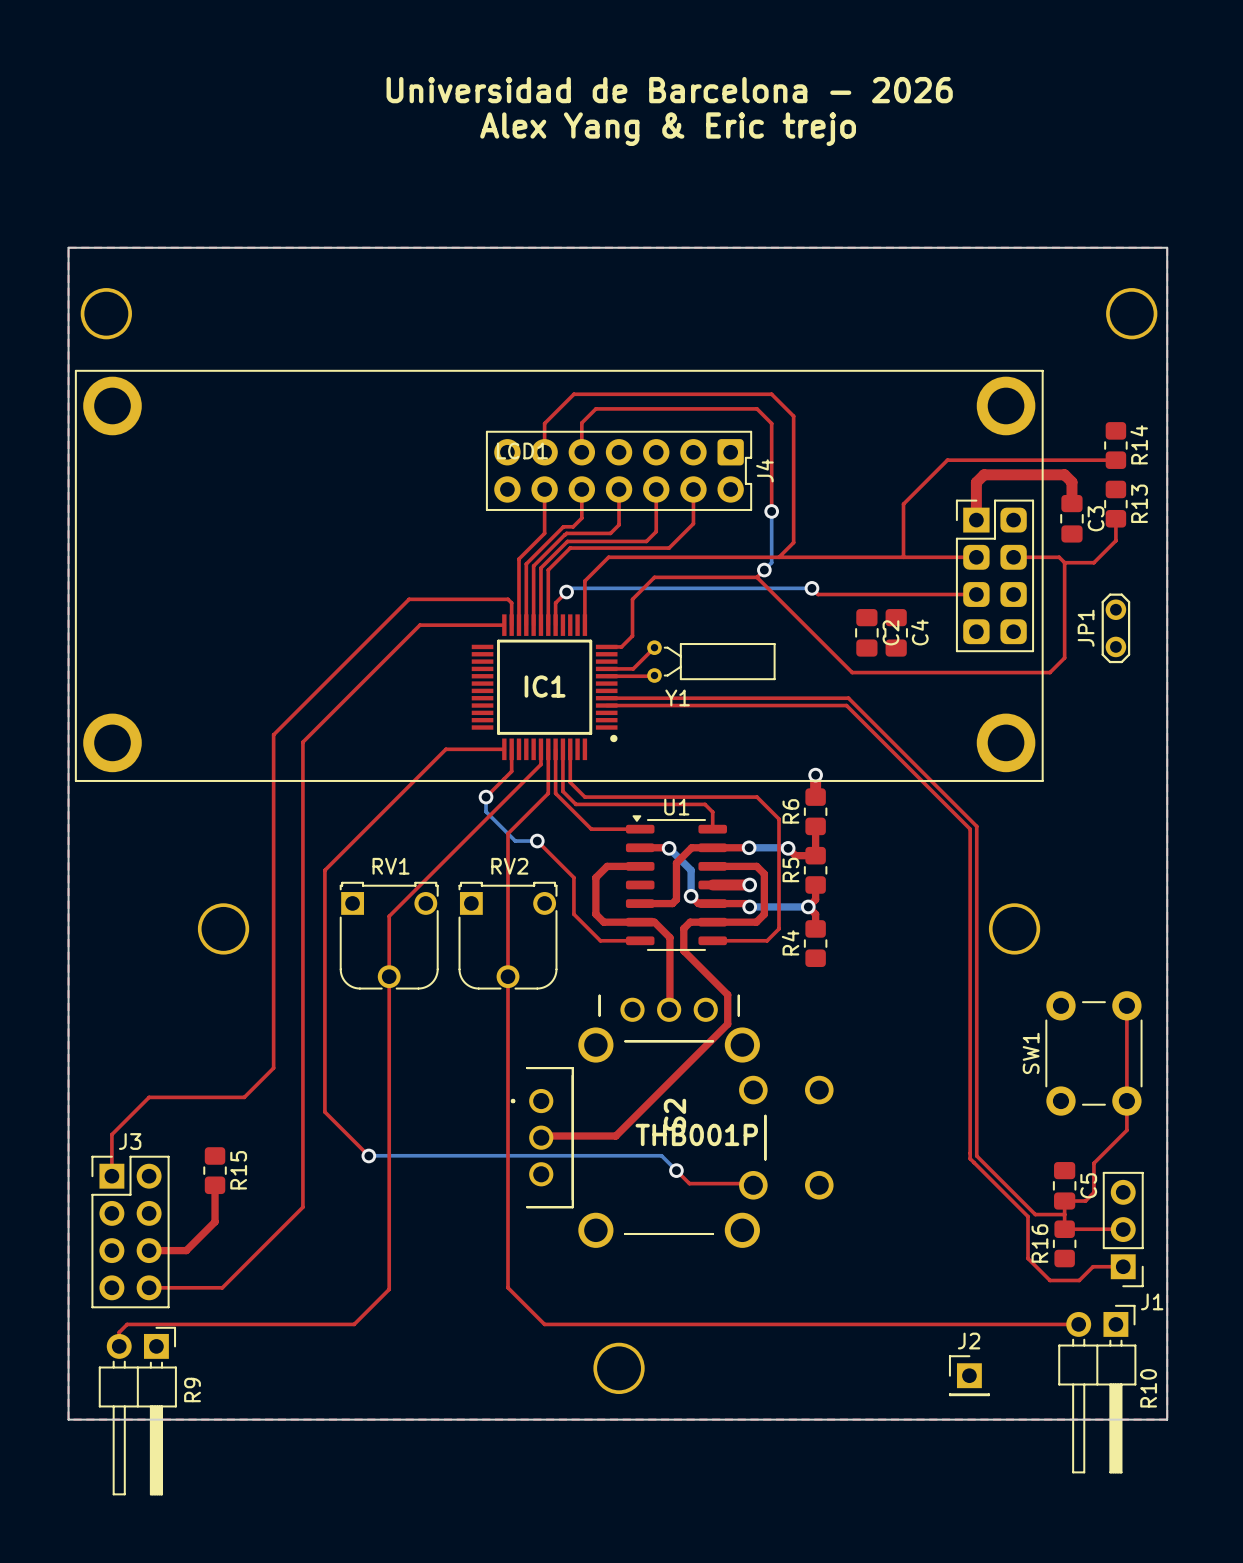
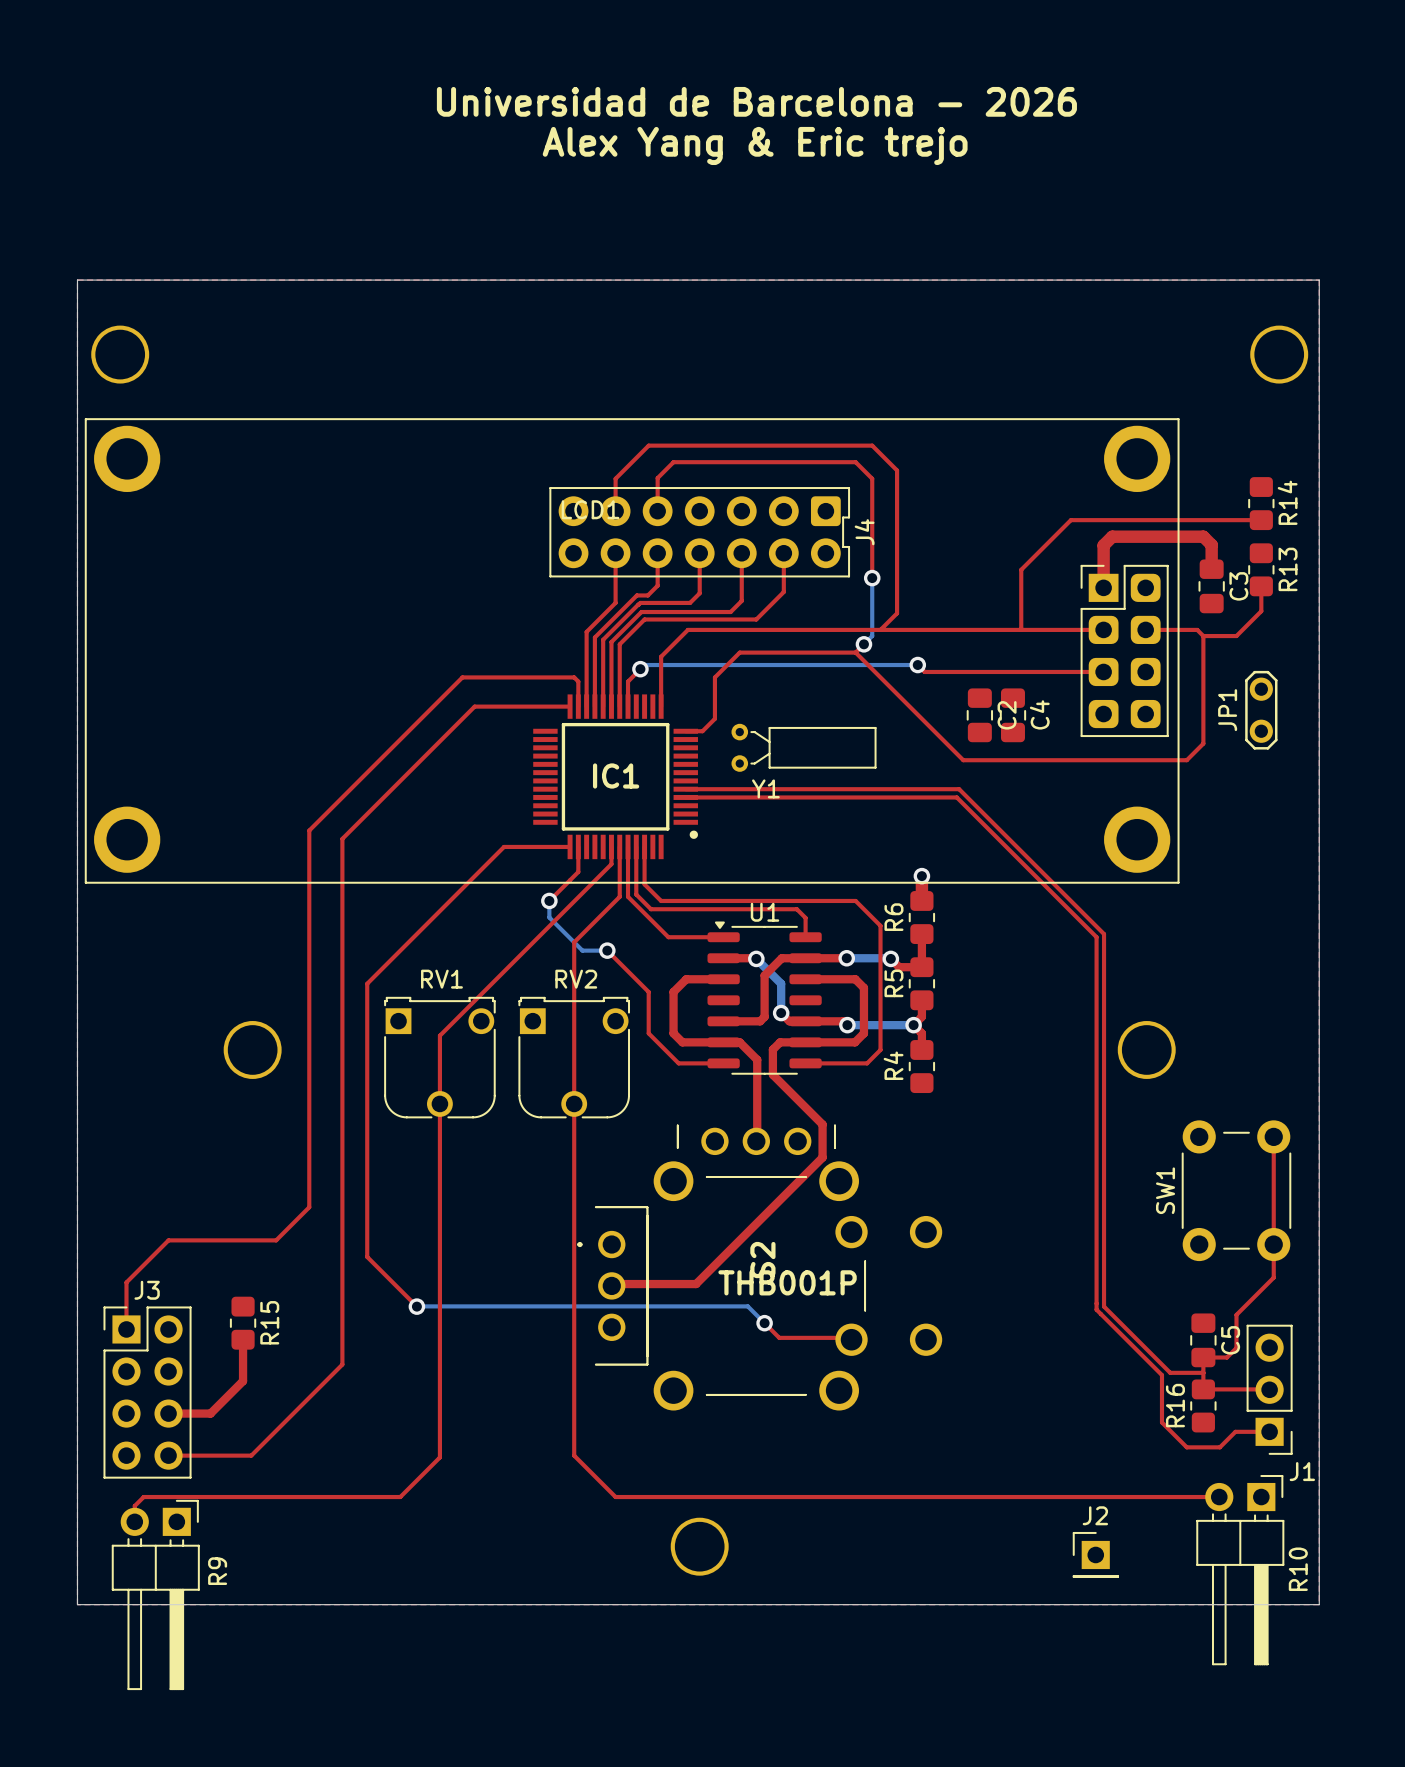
top track: (654, 647) (633, 668) (606, 668) -> none
top track: (654, 675) (606, 676) -> none
top track: (712, 884) (749, 884) -> none
via: (749, 884) -> none

